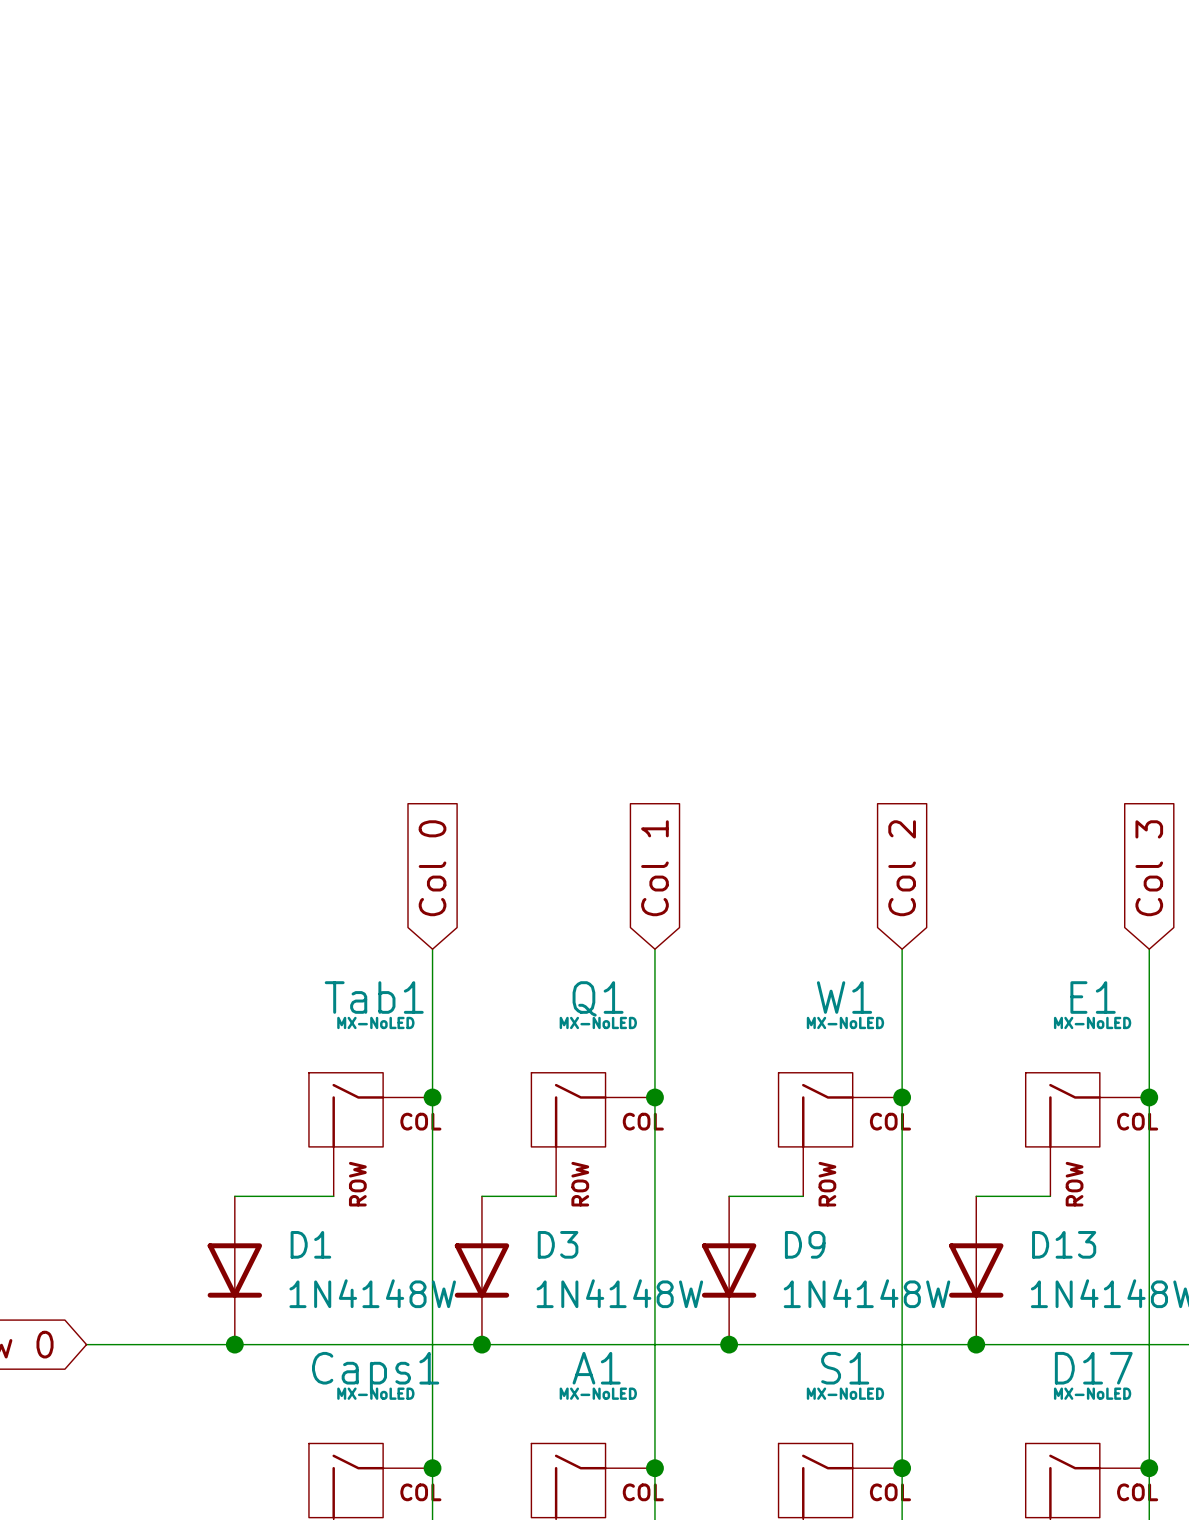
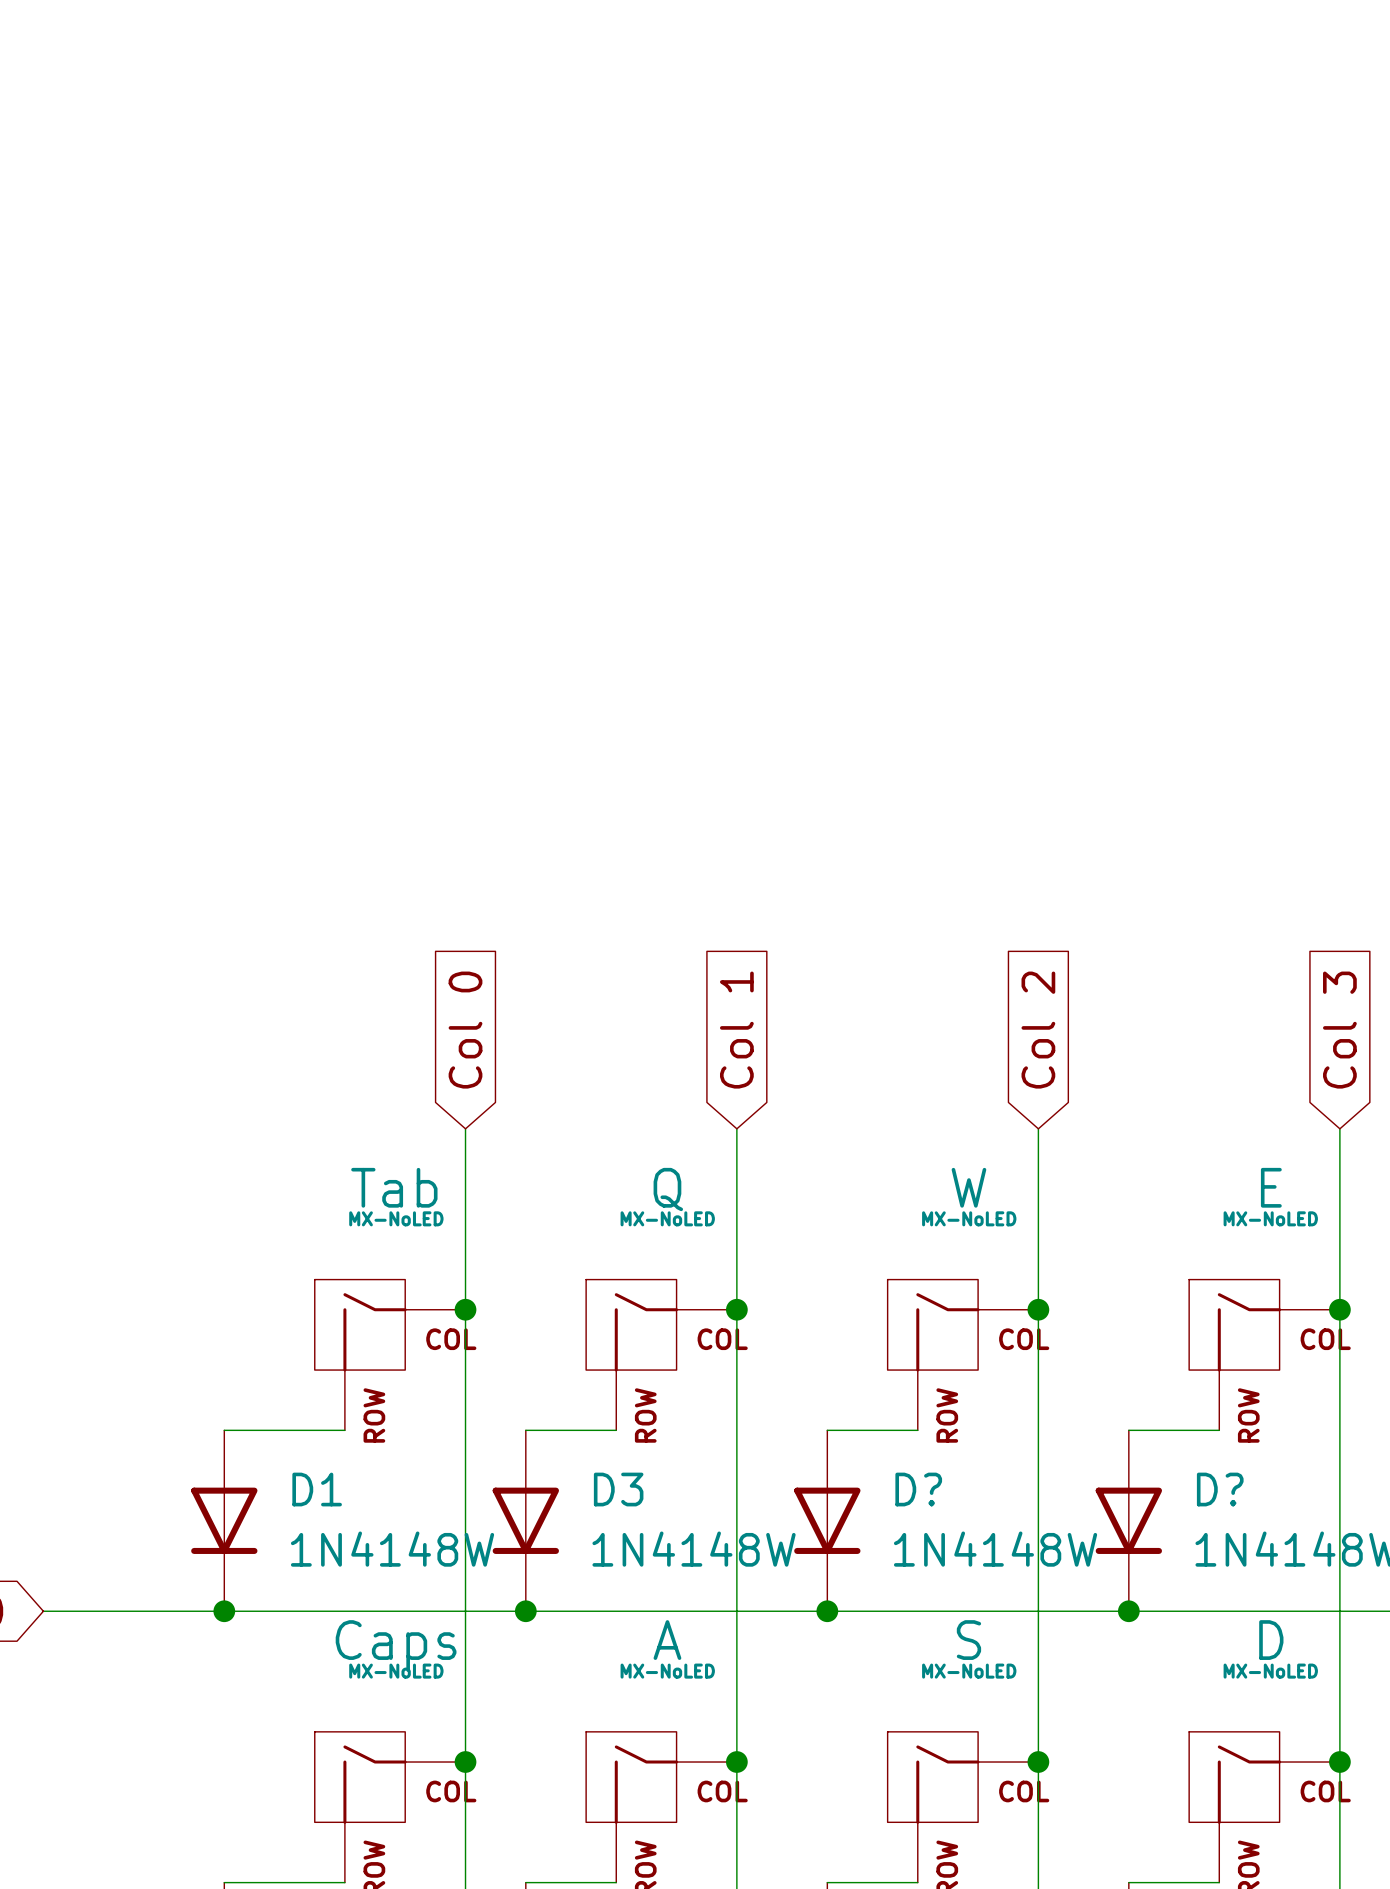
Tab1 name: Tab1 (374, 997) -> Tab (394, 1187)
W1 name: W1 (844, 997) -> W (968, 1187)
E1 name: E1 (1093, 997) -> E (1271, 1187)
Q1 name: Q1 (598, 998) -> Q (668, 1189)
D9 name: D9 (805, 1244) -> D? (918, 1489)
D13 name: D13 (1064, 1244) -> D? (1220, 1489)
A1 name: A1 (596, 1368) -> A (667, 1640)
S1 name: S1 (845, 1368) -> S (968, 1640)
D17 name: D17 (1093, 1368) -> D (1271, 1640)
Caps1 name: Caps1 (375, 1373) -> Caps (396, 1646)

